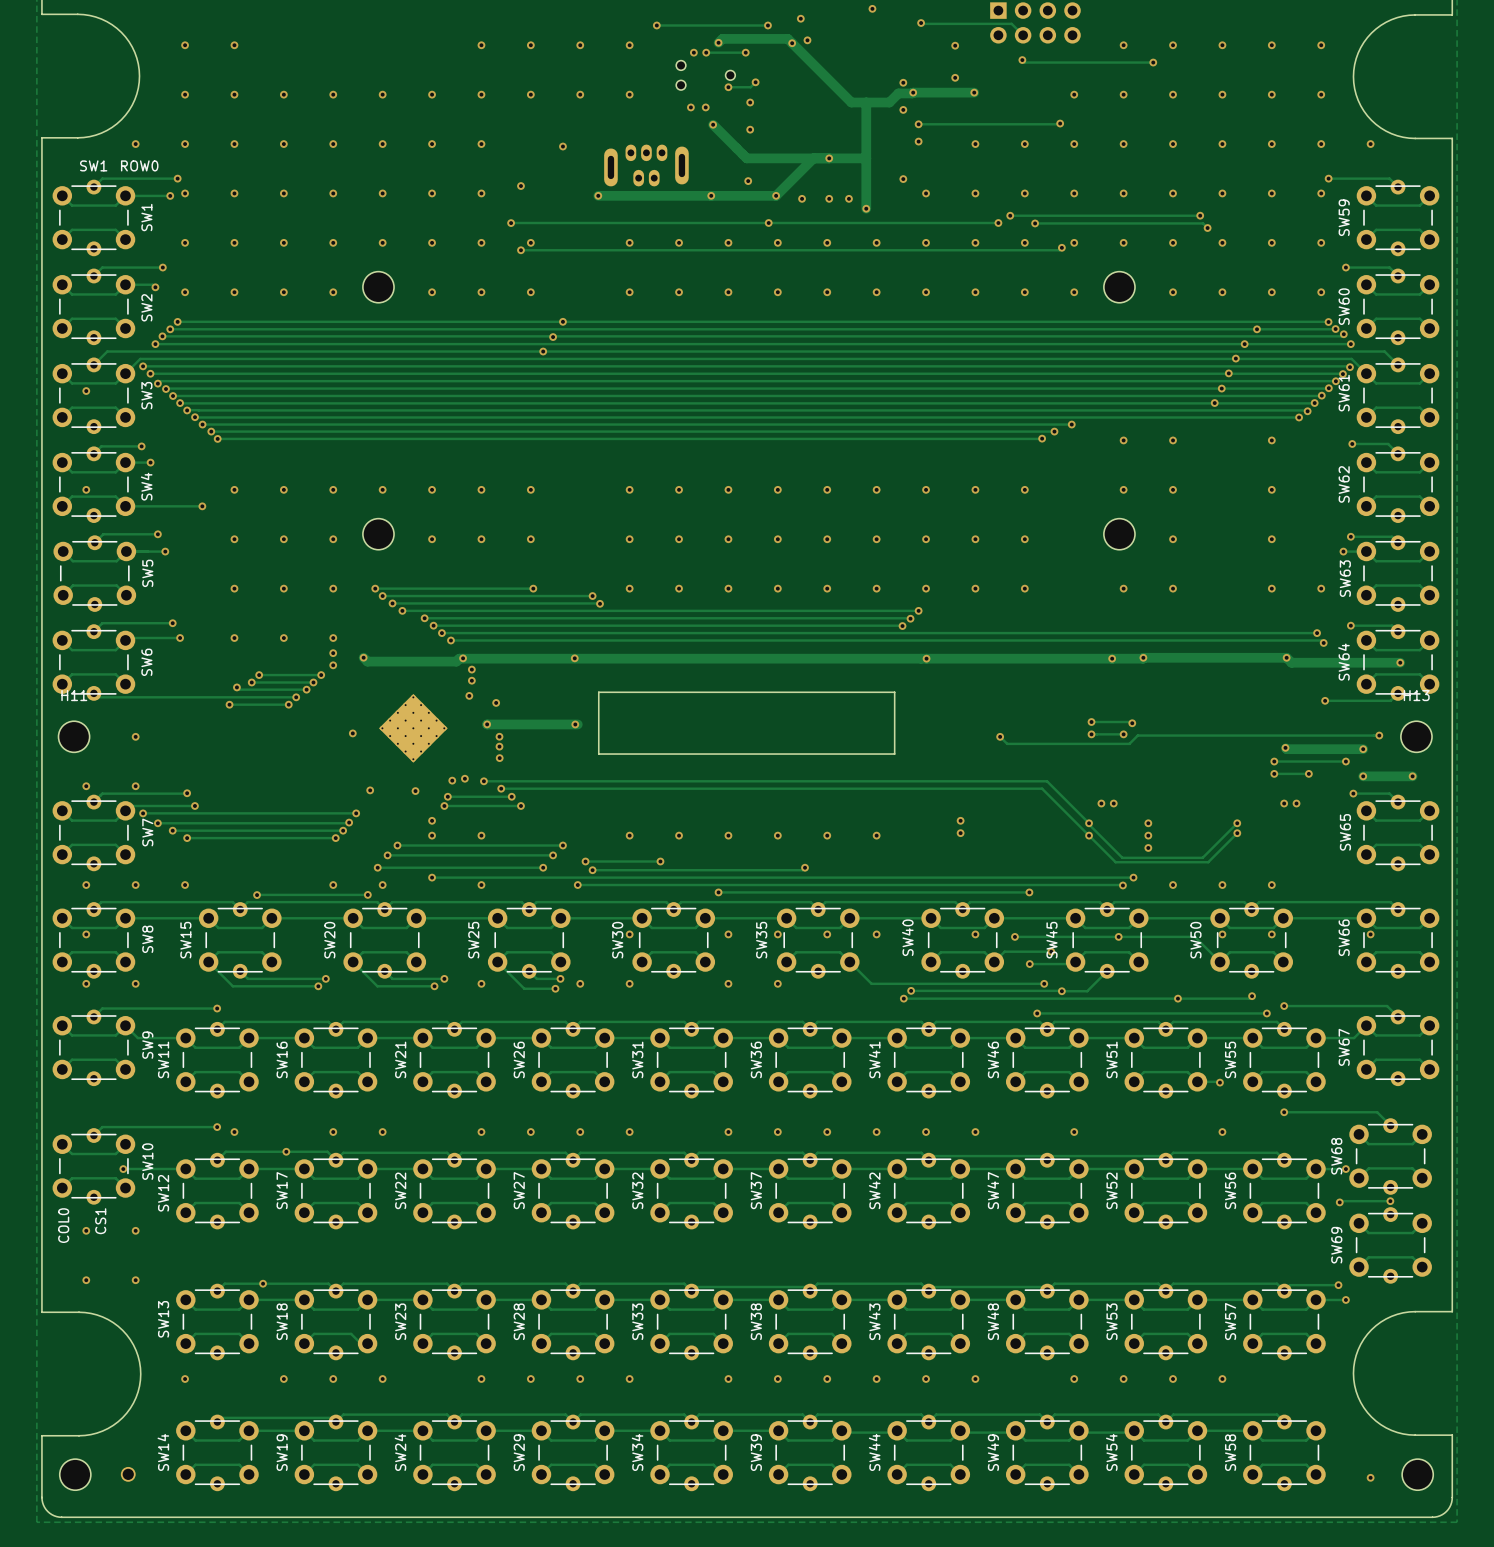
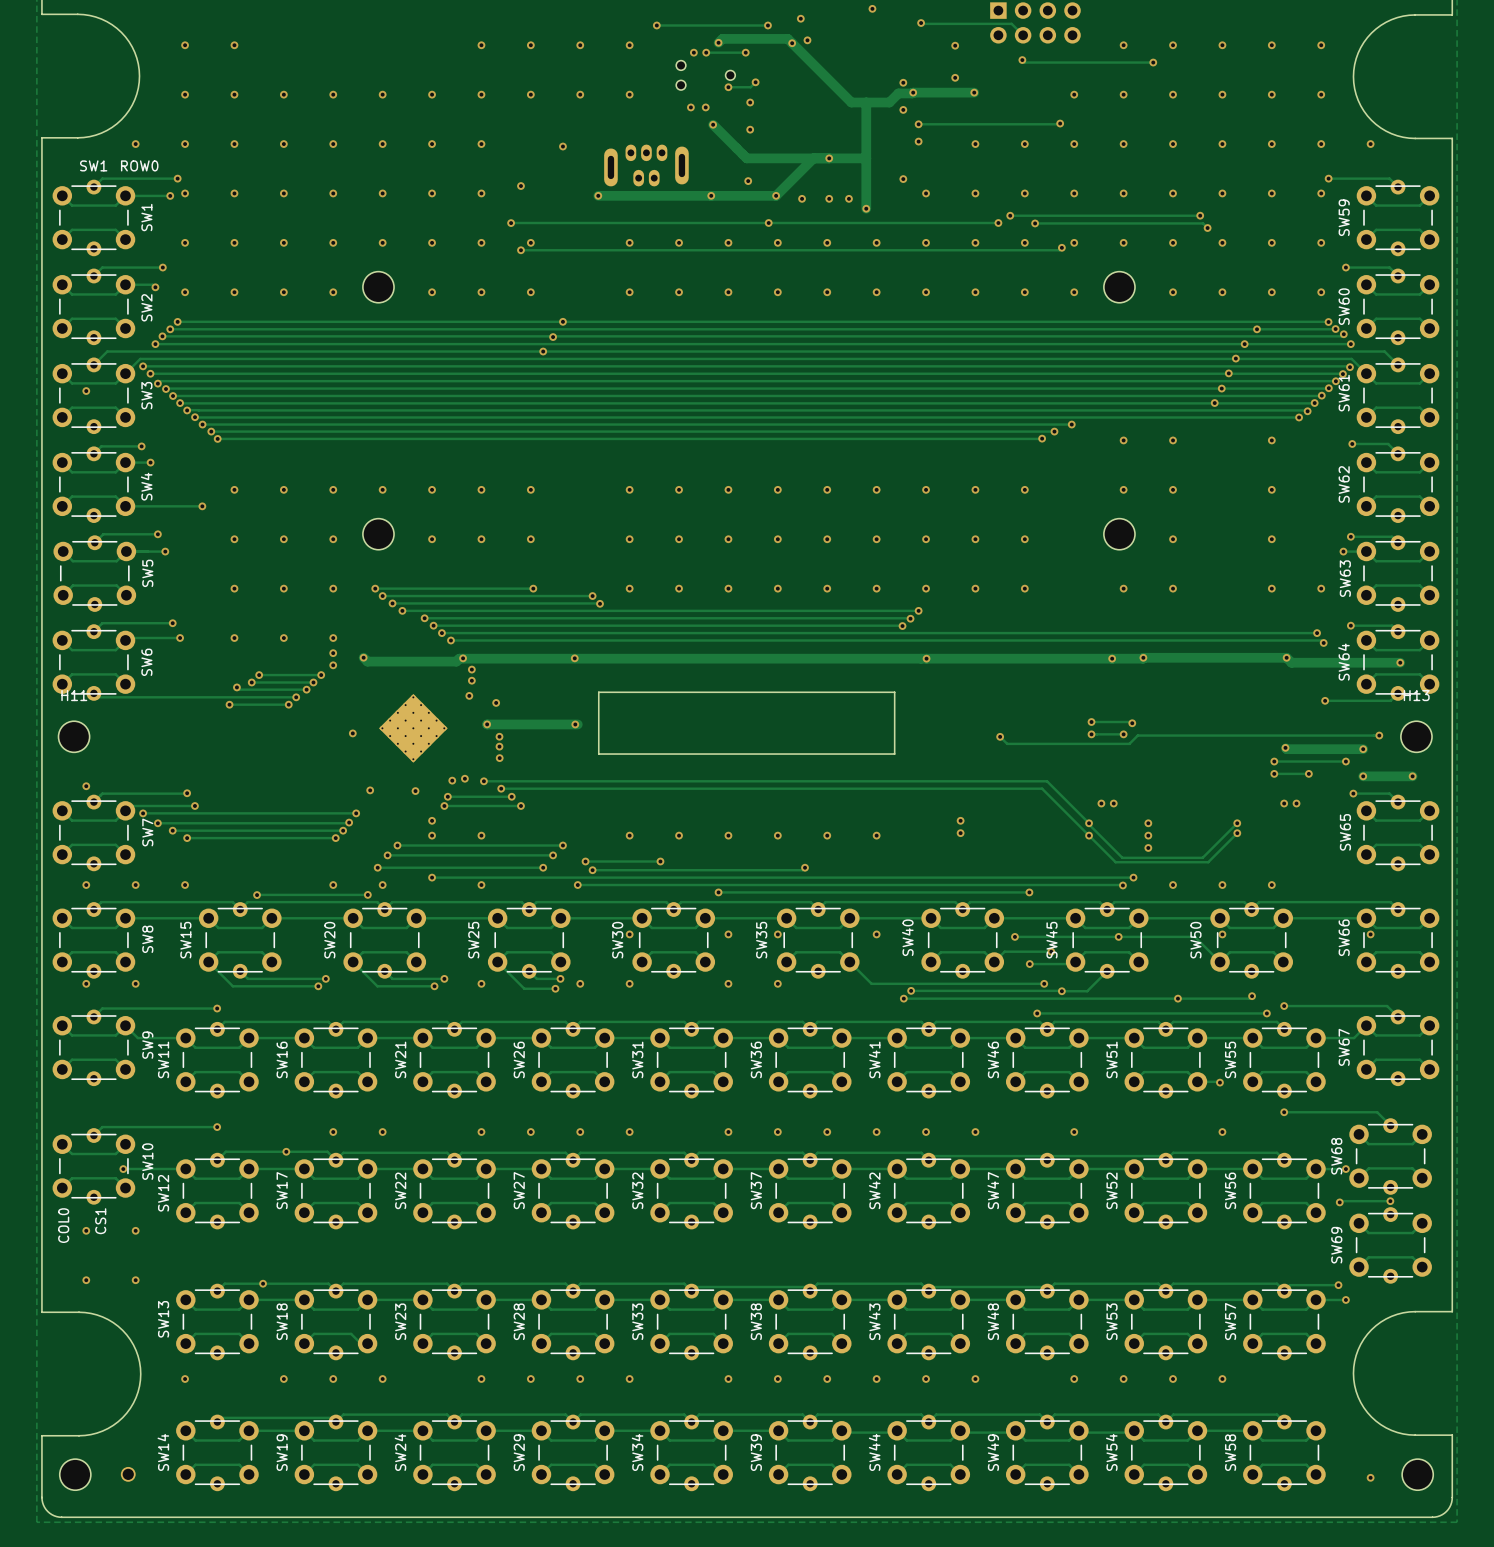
via: (86, 489) -> none
via: (135, 736) -> none
via: (135, 786) -> none
via: (86, 934) -> none
via: (827, 934) -> none
via: (975, 934) -> none
via: (1271, 934) -> none
via: (234, 1132) -> none

